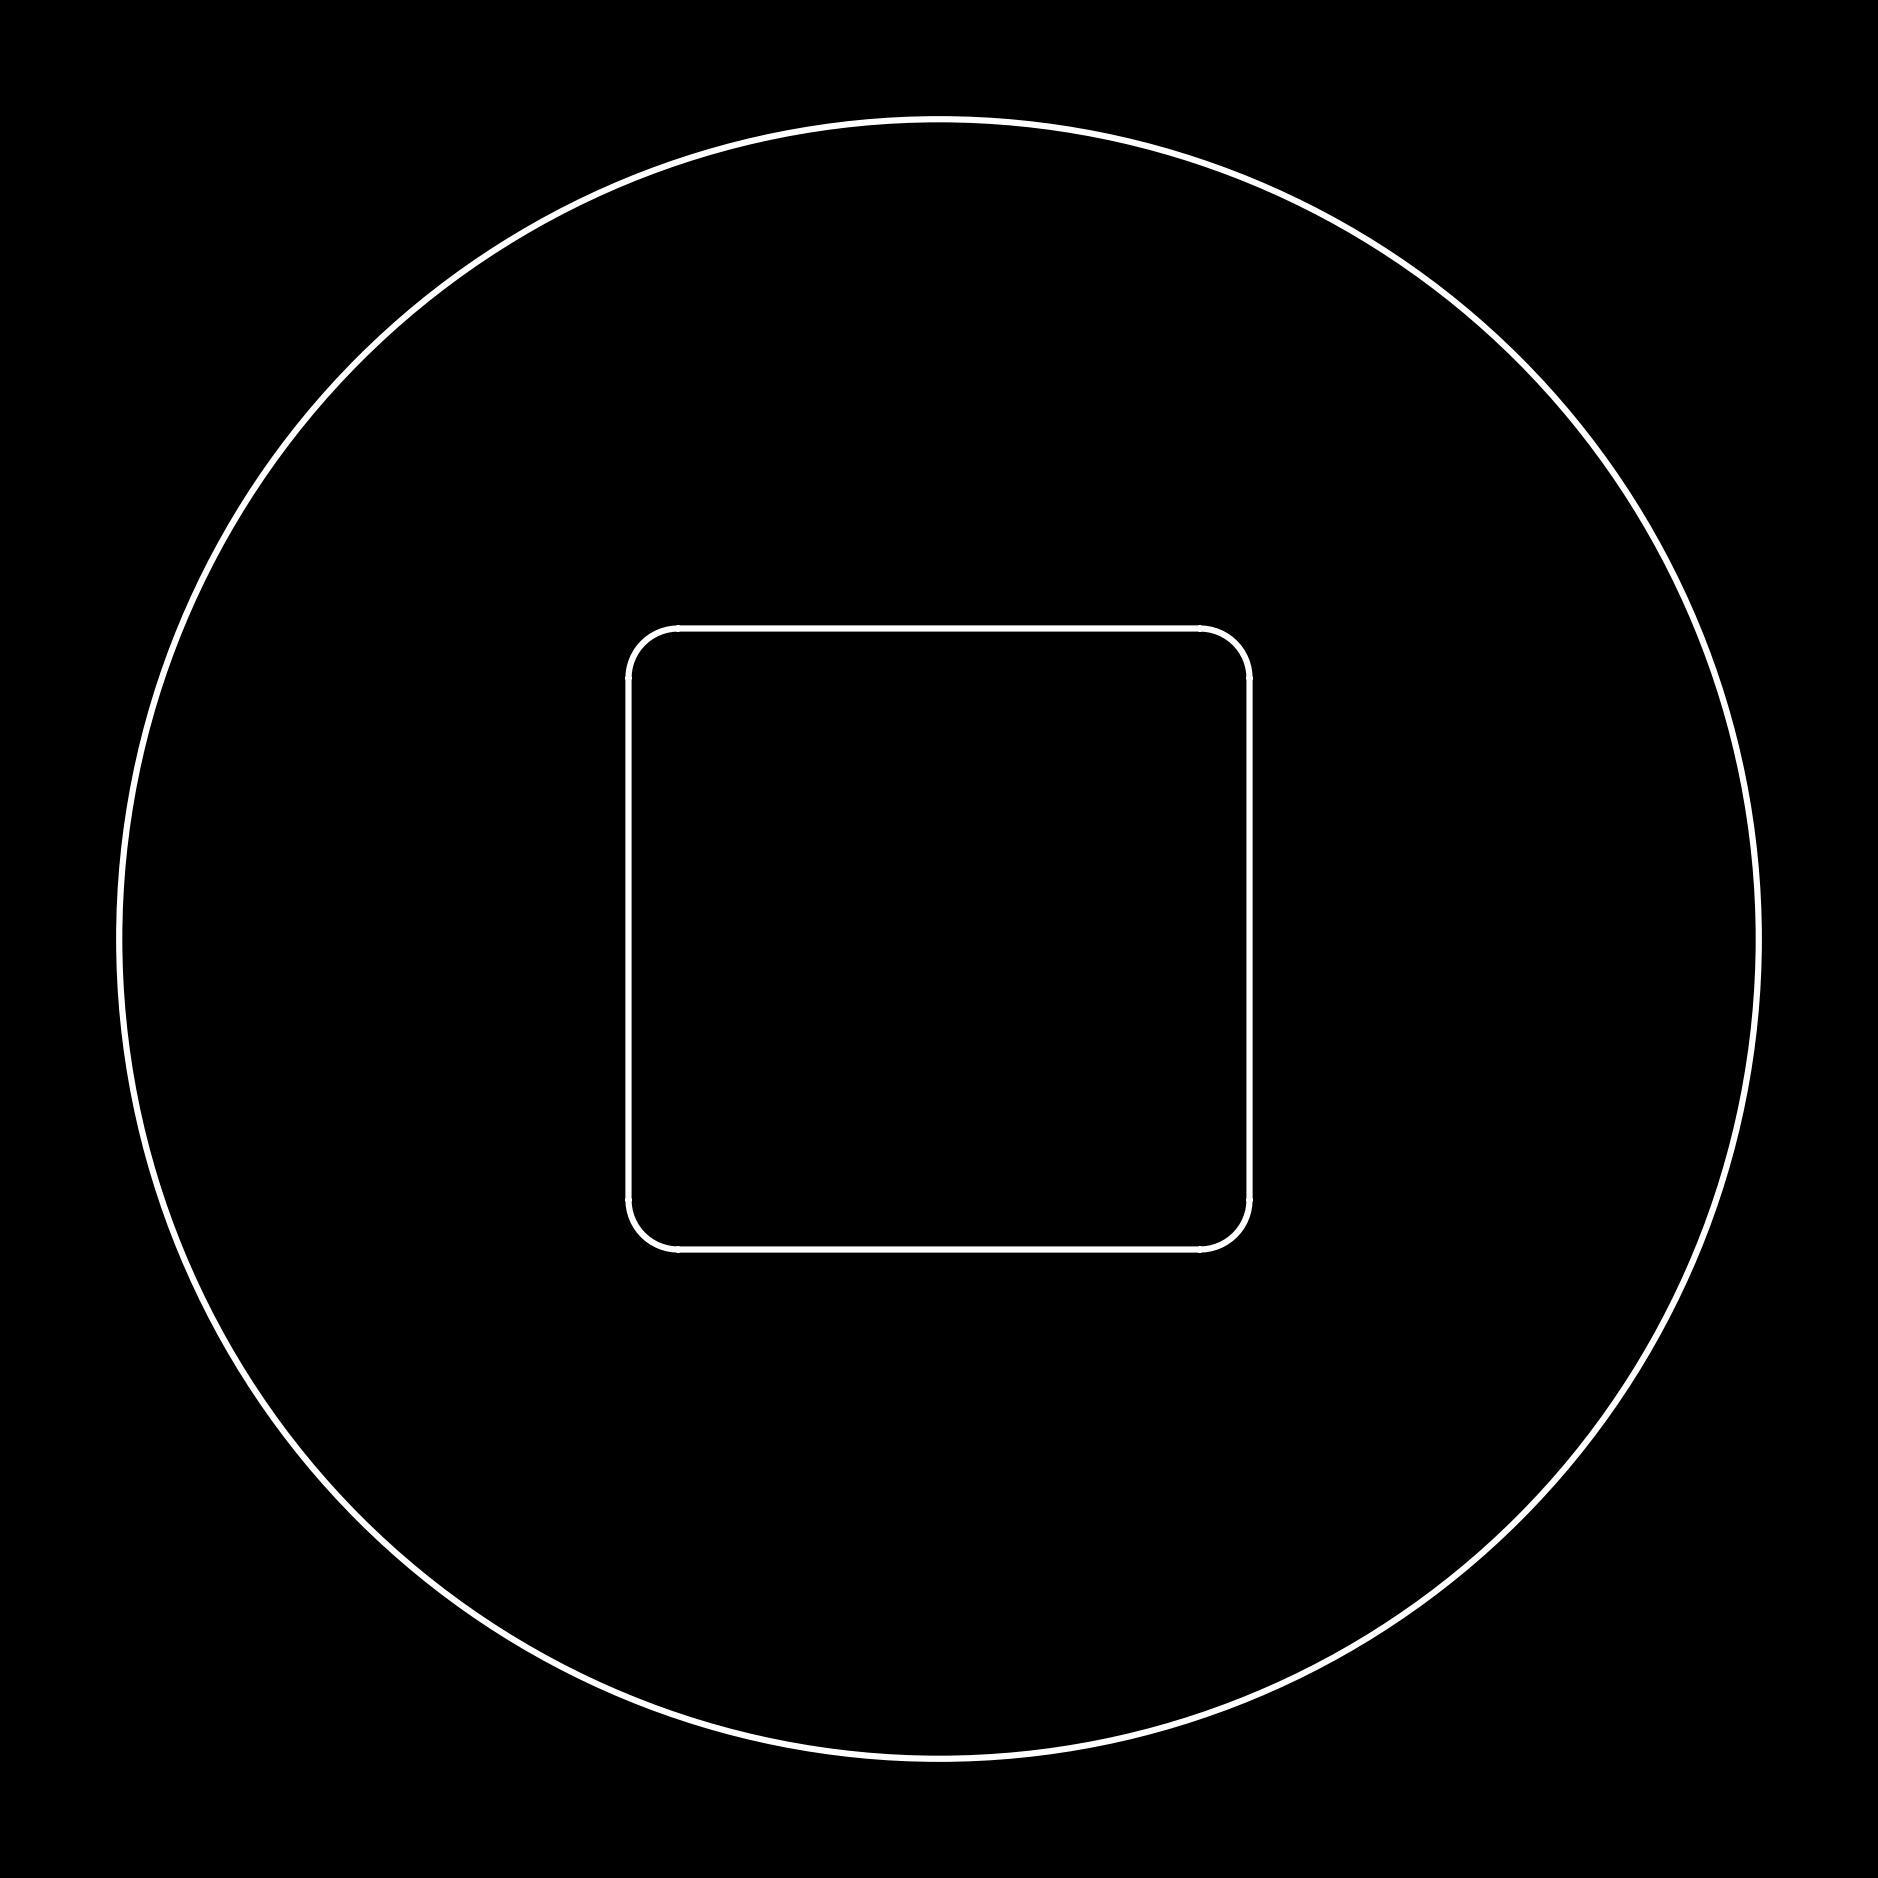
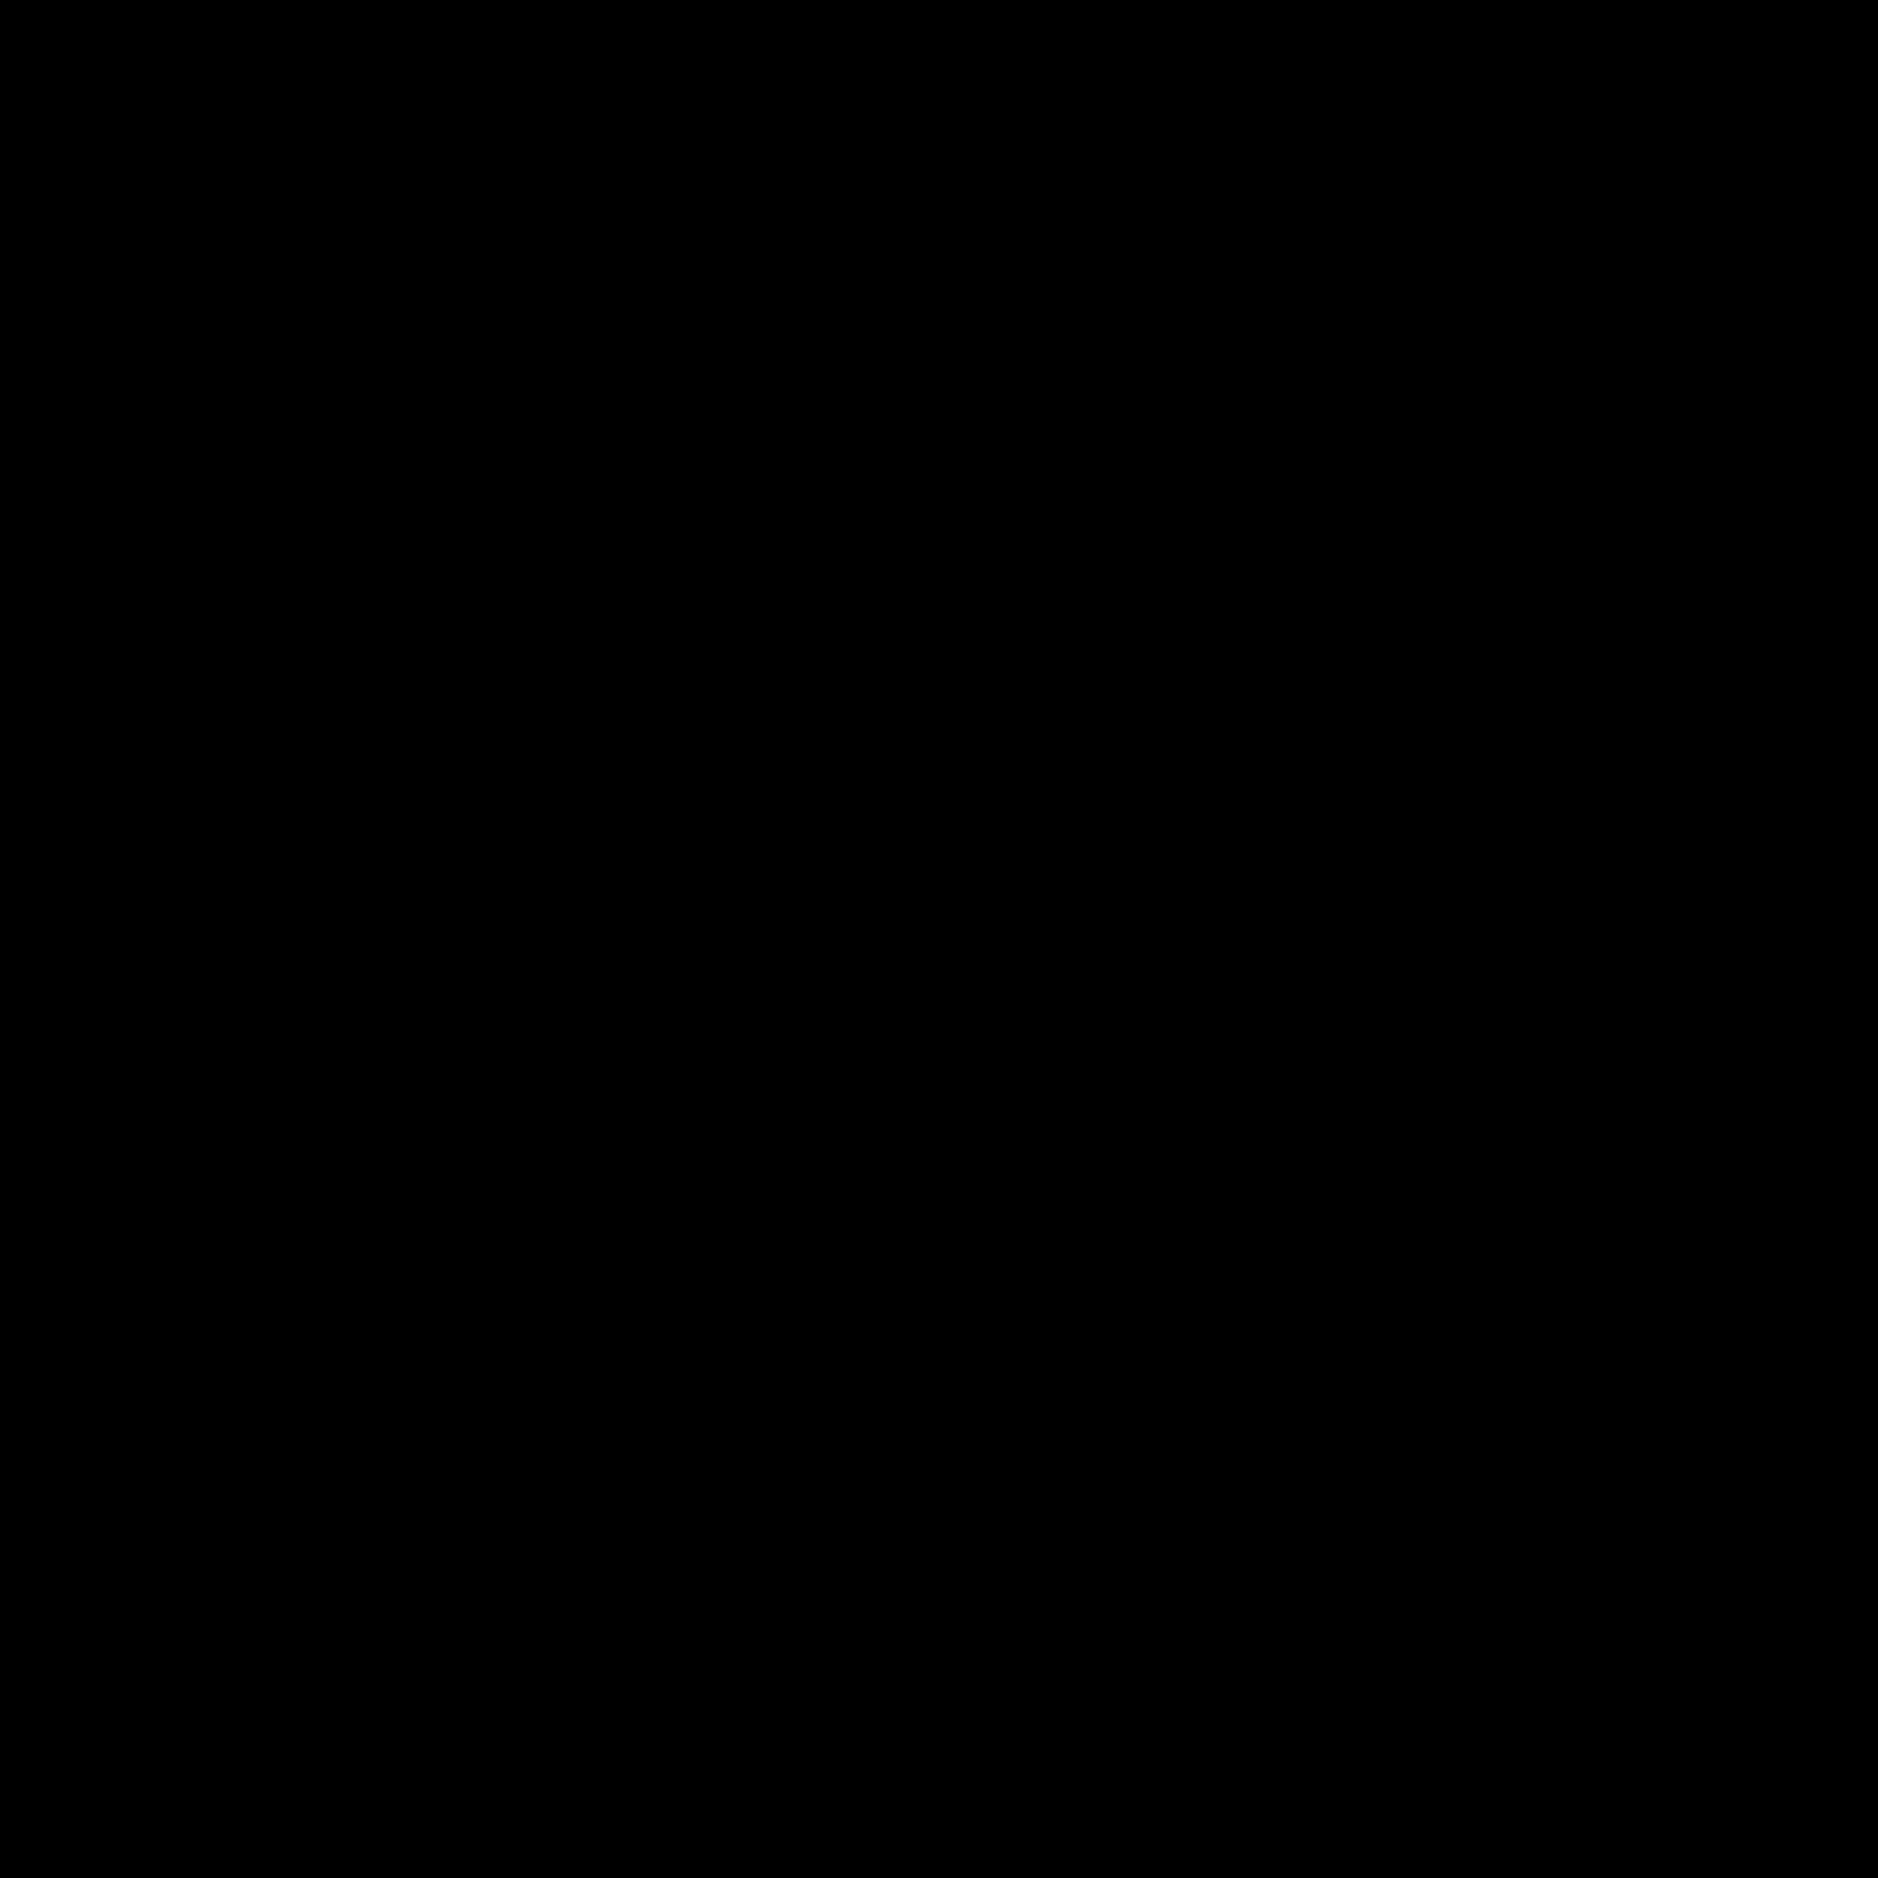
round board edge: [116, 116, 1762, 1762] -> none
board edge: (1199, 628) (678, 628) (656, 633) (643, 643) (633, 656) (628, 678) (628, 1199) (633, 1221) (643, 1234) (656, 1244) (678, 1249) (1199, 1249) (1221, 1244) (1234, 1234) (1246, 1216) (1249, 1199) (1249, 672) (1244, 656) (1234, 643) (1221, 633) (1199, 628) -> none

